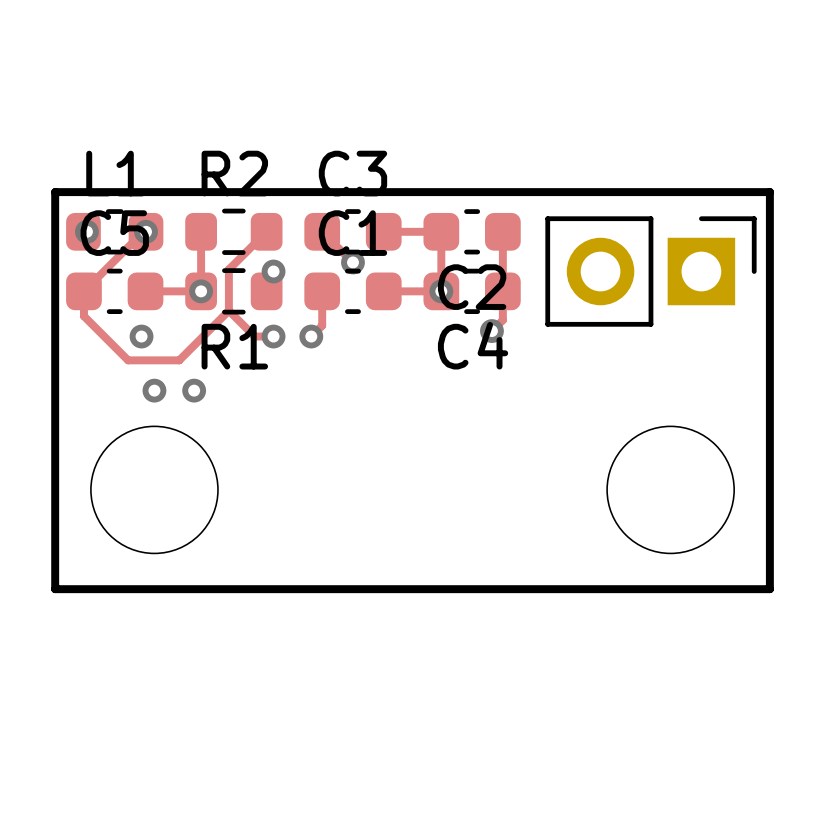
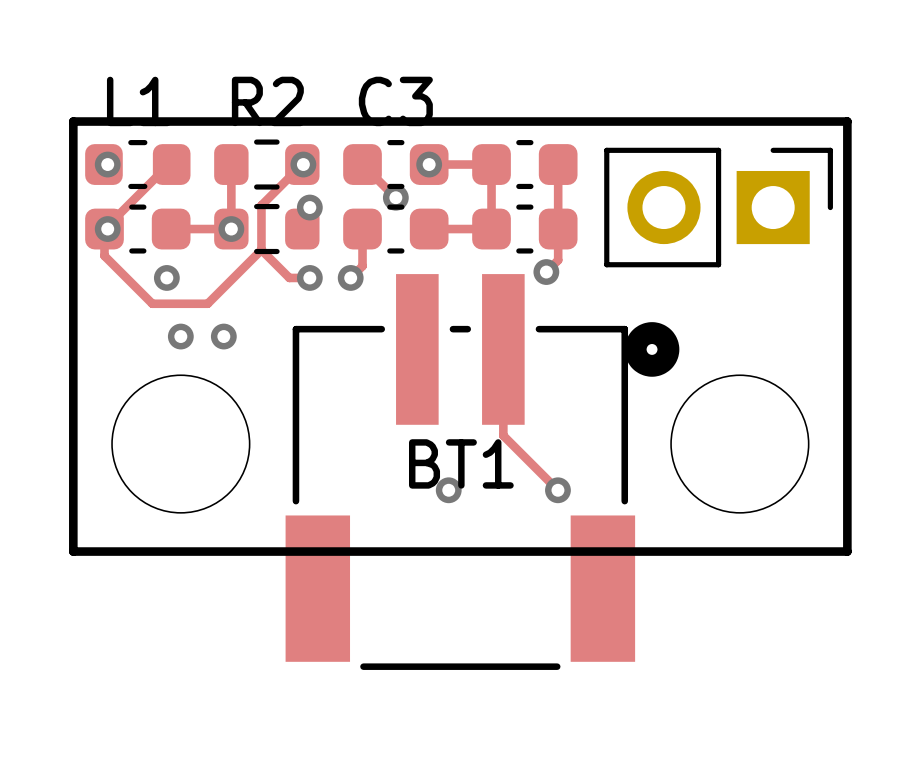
via: (146, 231) -> none
via: none -> (303, 164)
C5 name: C5 (114, 233) -> none
C1 name: C1 (352, 233) -> none
C2 name: C2 (472, 287) -> none
via: none -> (107, 229)
via position: (441, 291) -> (429, 164)
C4 name: C4 (473, 345) -> none
R1 name: R1 (234, 346) -> none
track: none -> (503, 349) (503, 435) (557, 490)
BT1: none -> (482, 472)
via: none -> (448, 490)
via: none -> (557, 490)

